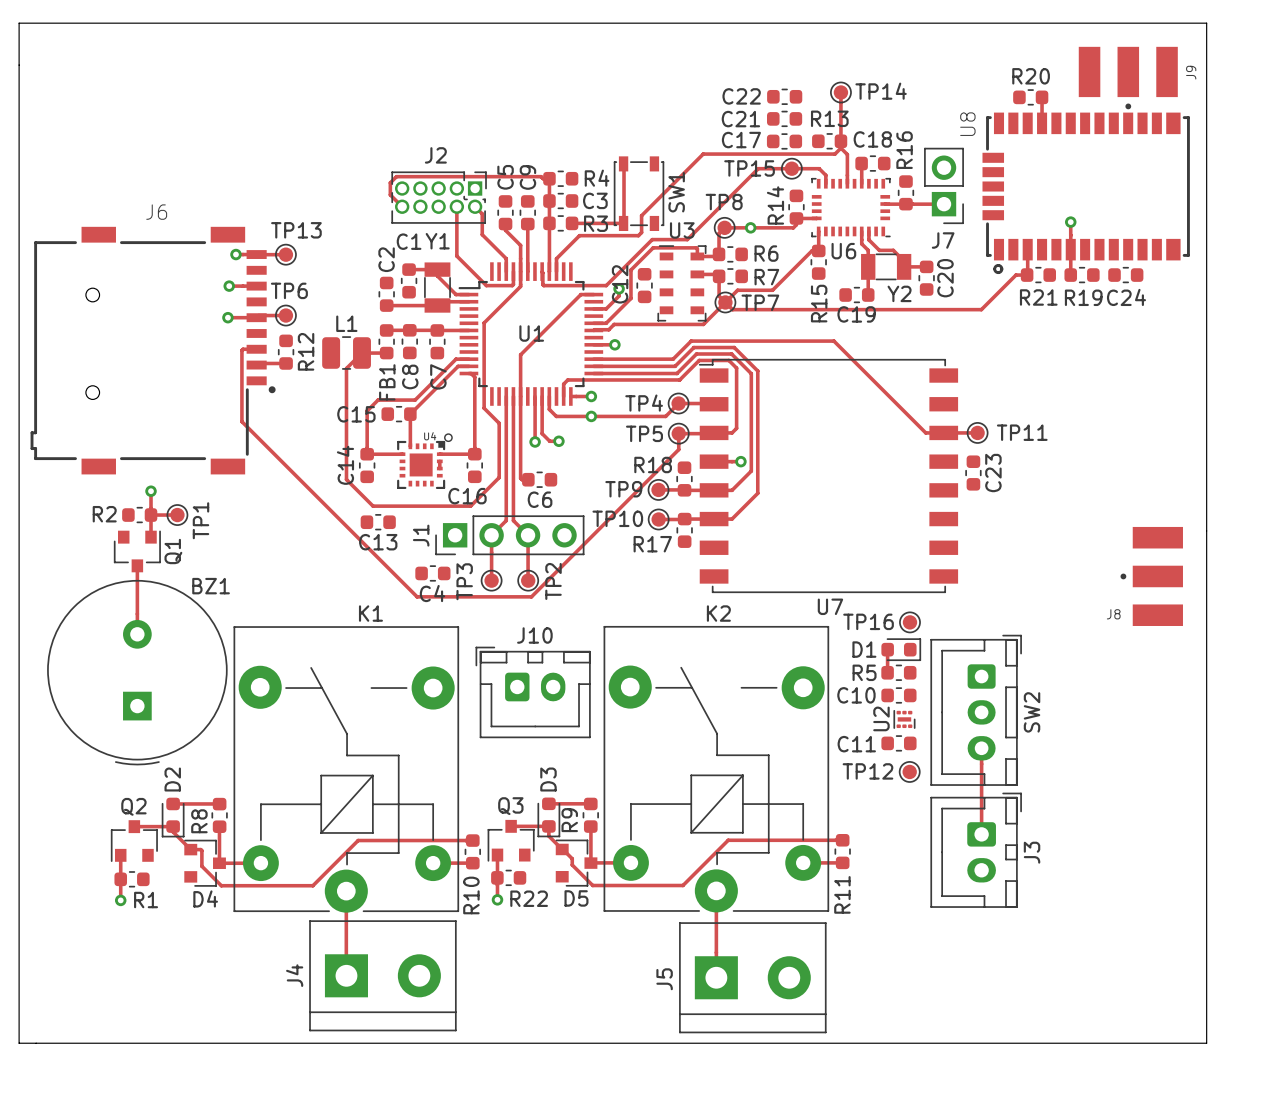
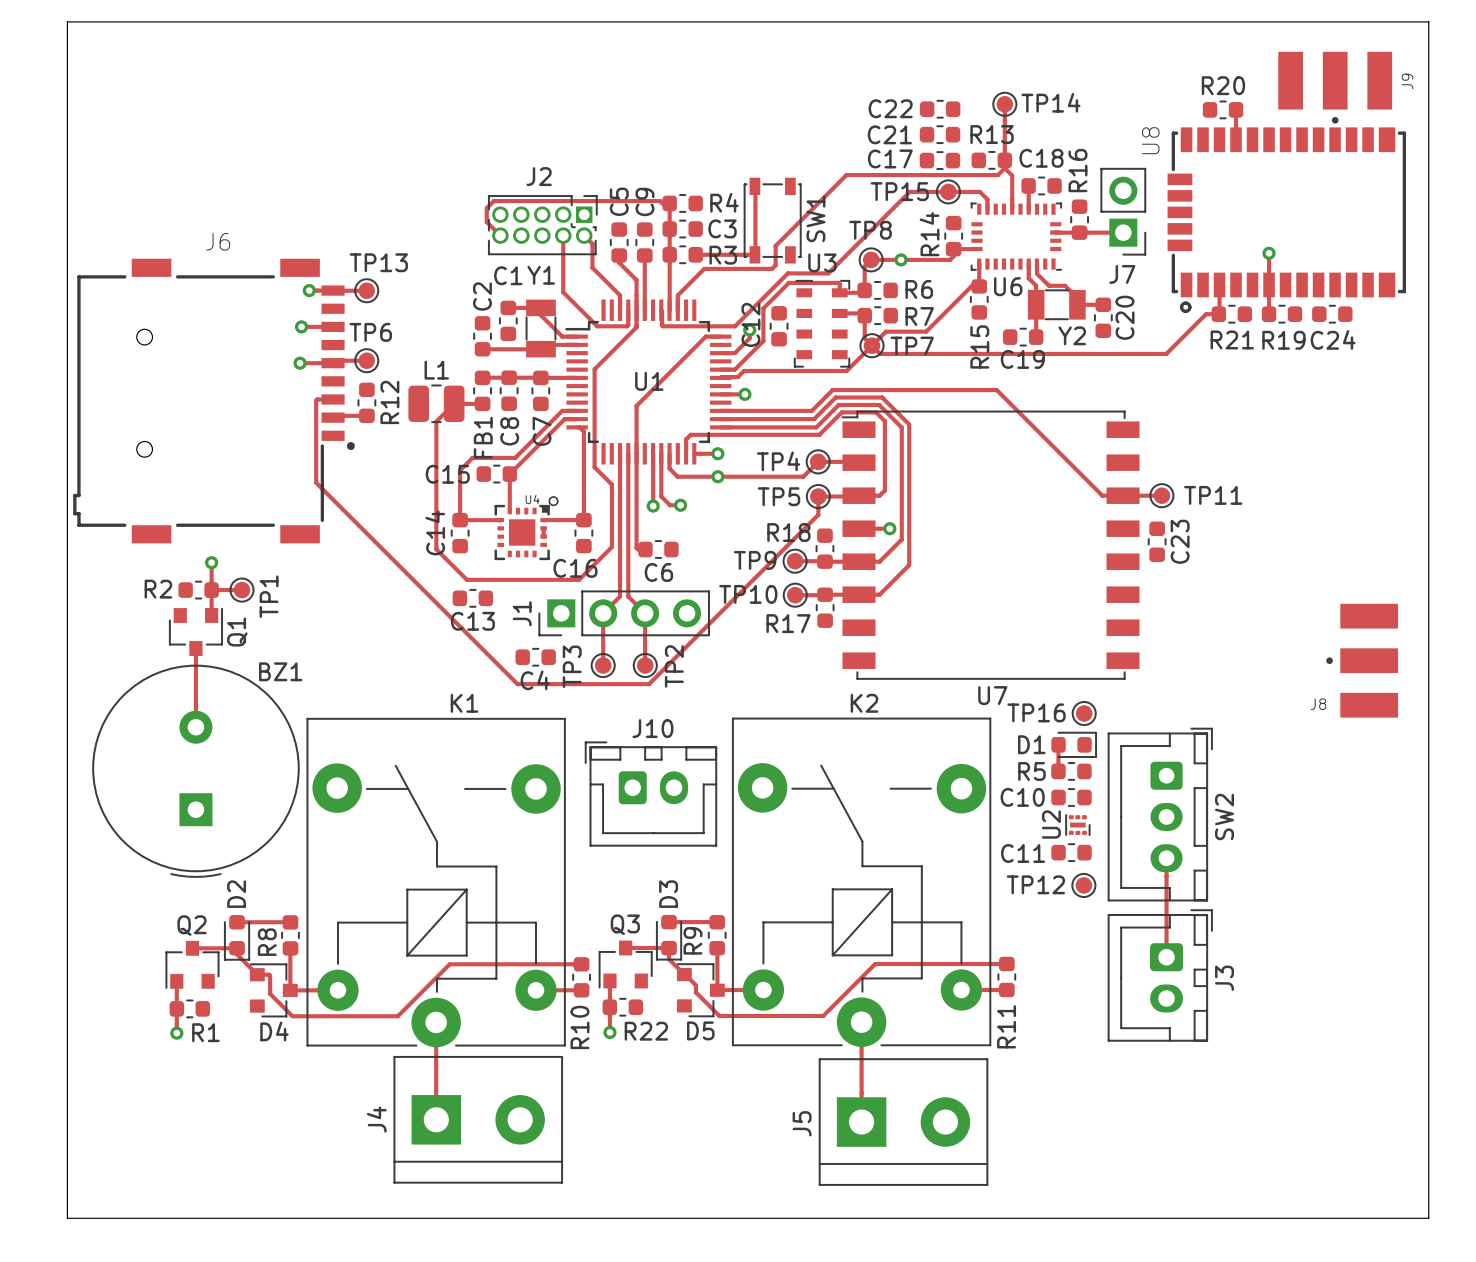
board edge: (19, 23) (19, 1043) (1206, 1043) (1206, 23) (19, 23) -> (67, 21) (67, 1218) (1428, 1218) (1428, 21) (67, 21)

